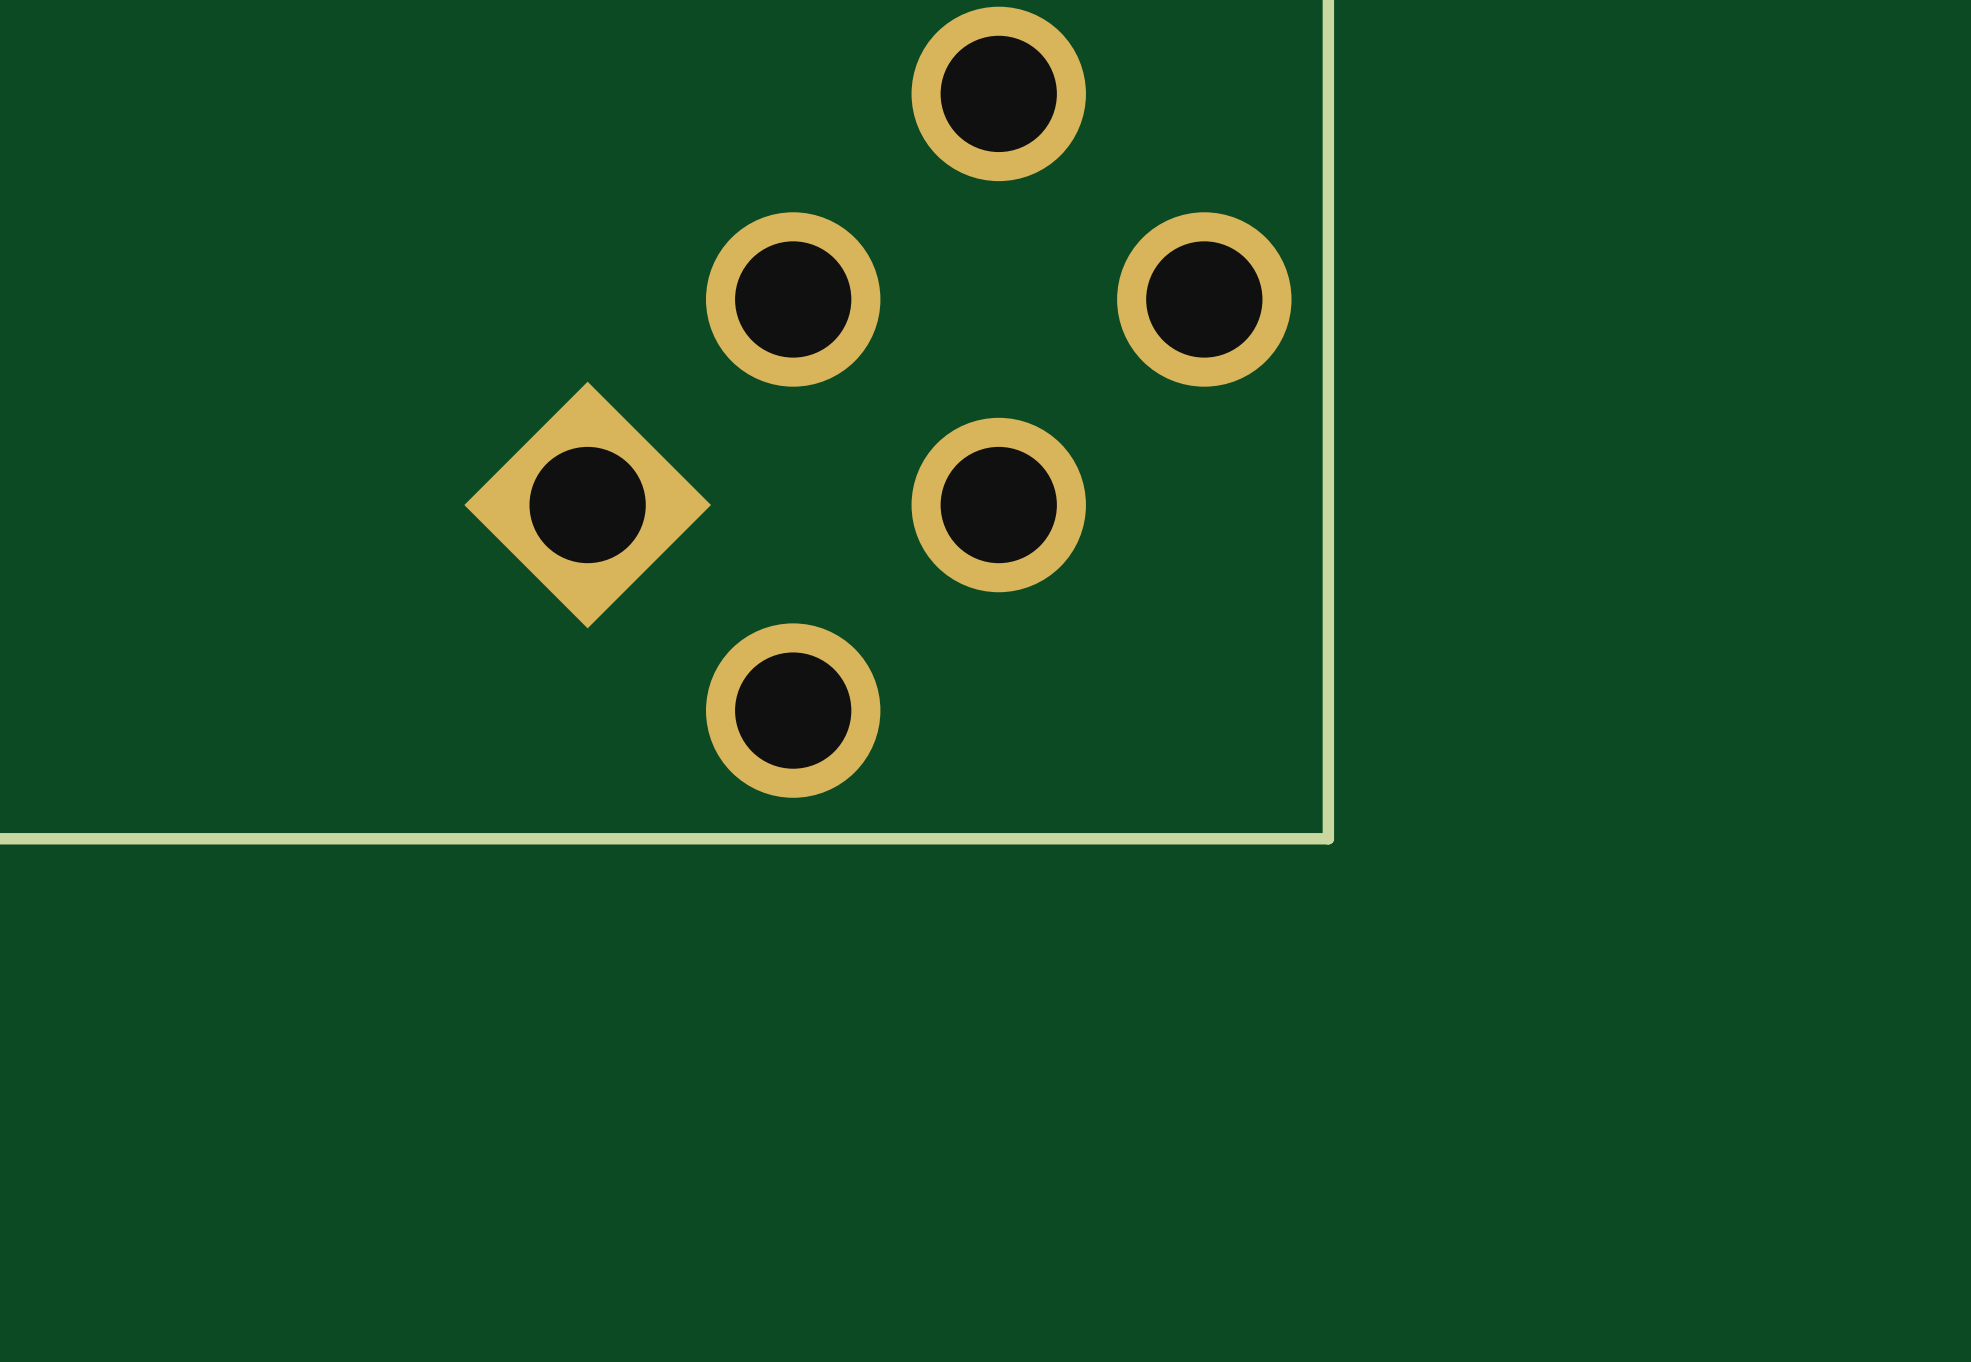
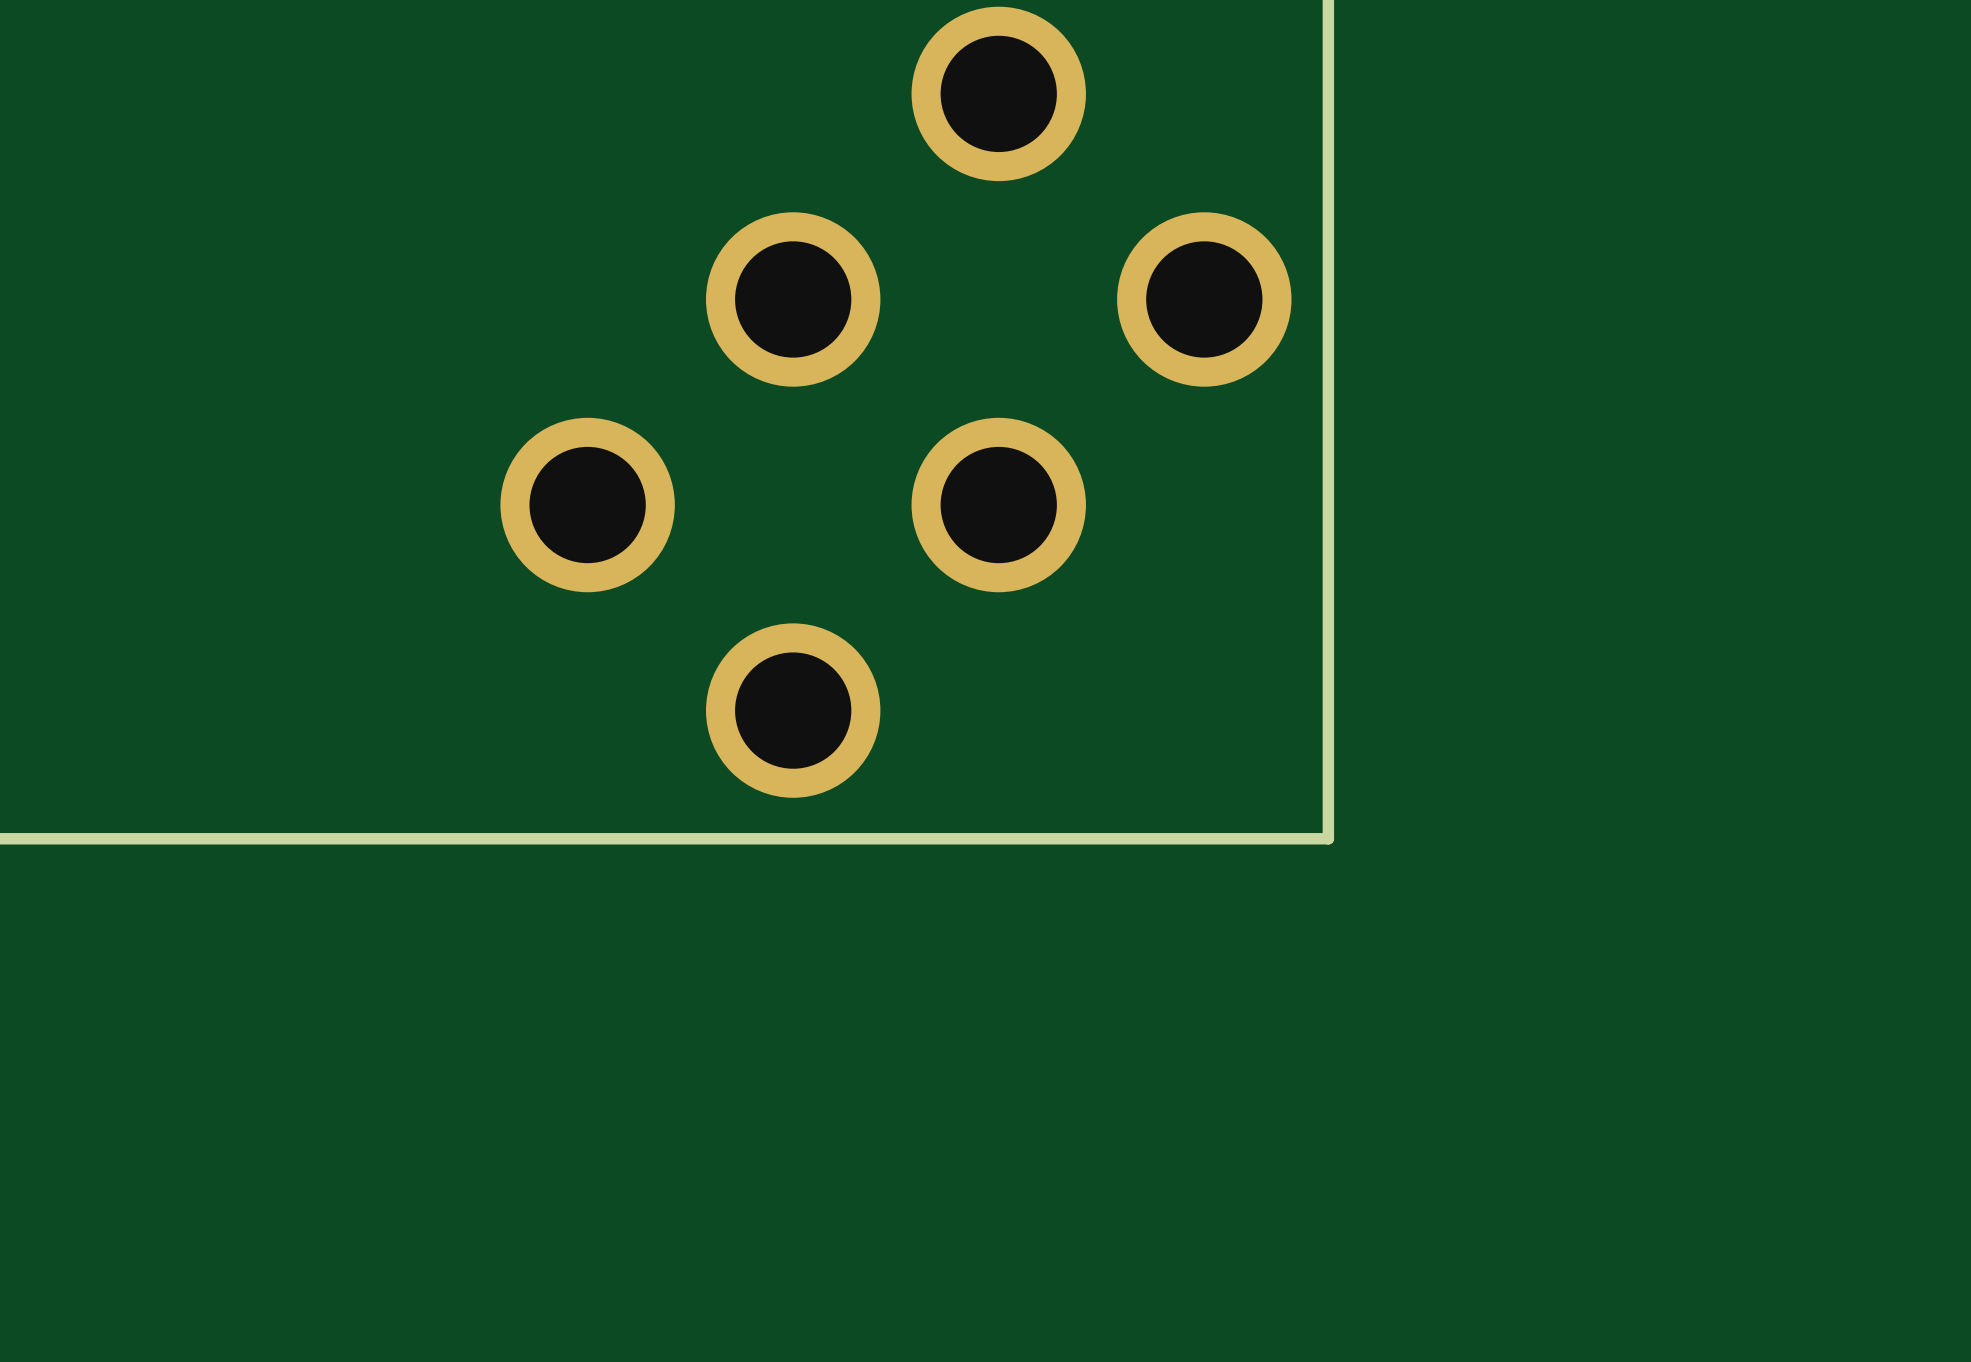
part footprint: [464, 6, 1292, 798] -> [500, 6, 1292, 798]

